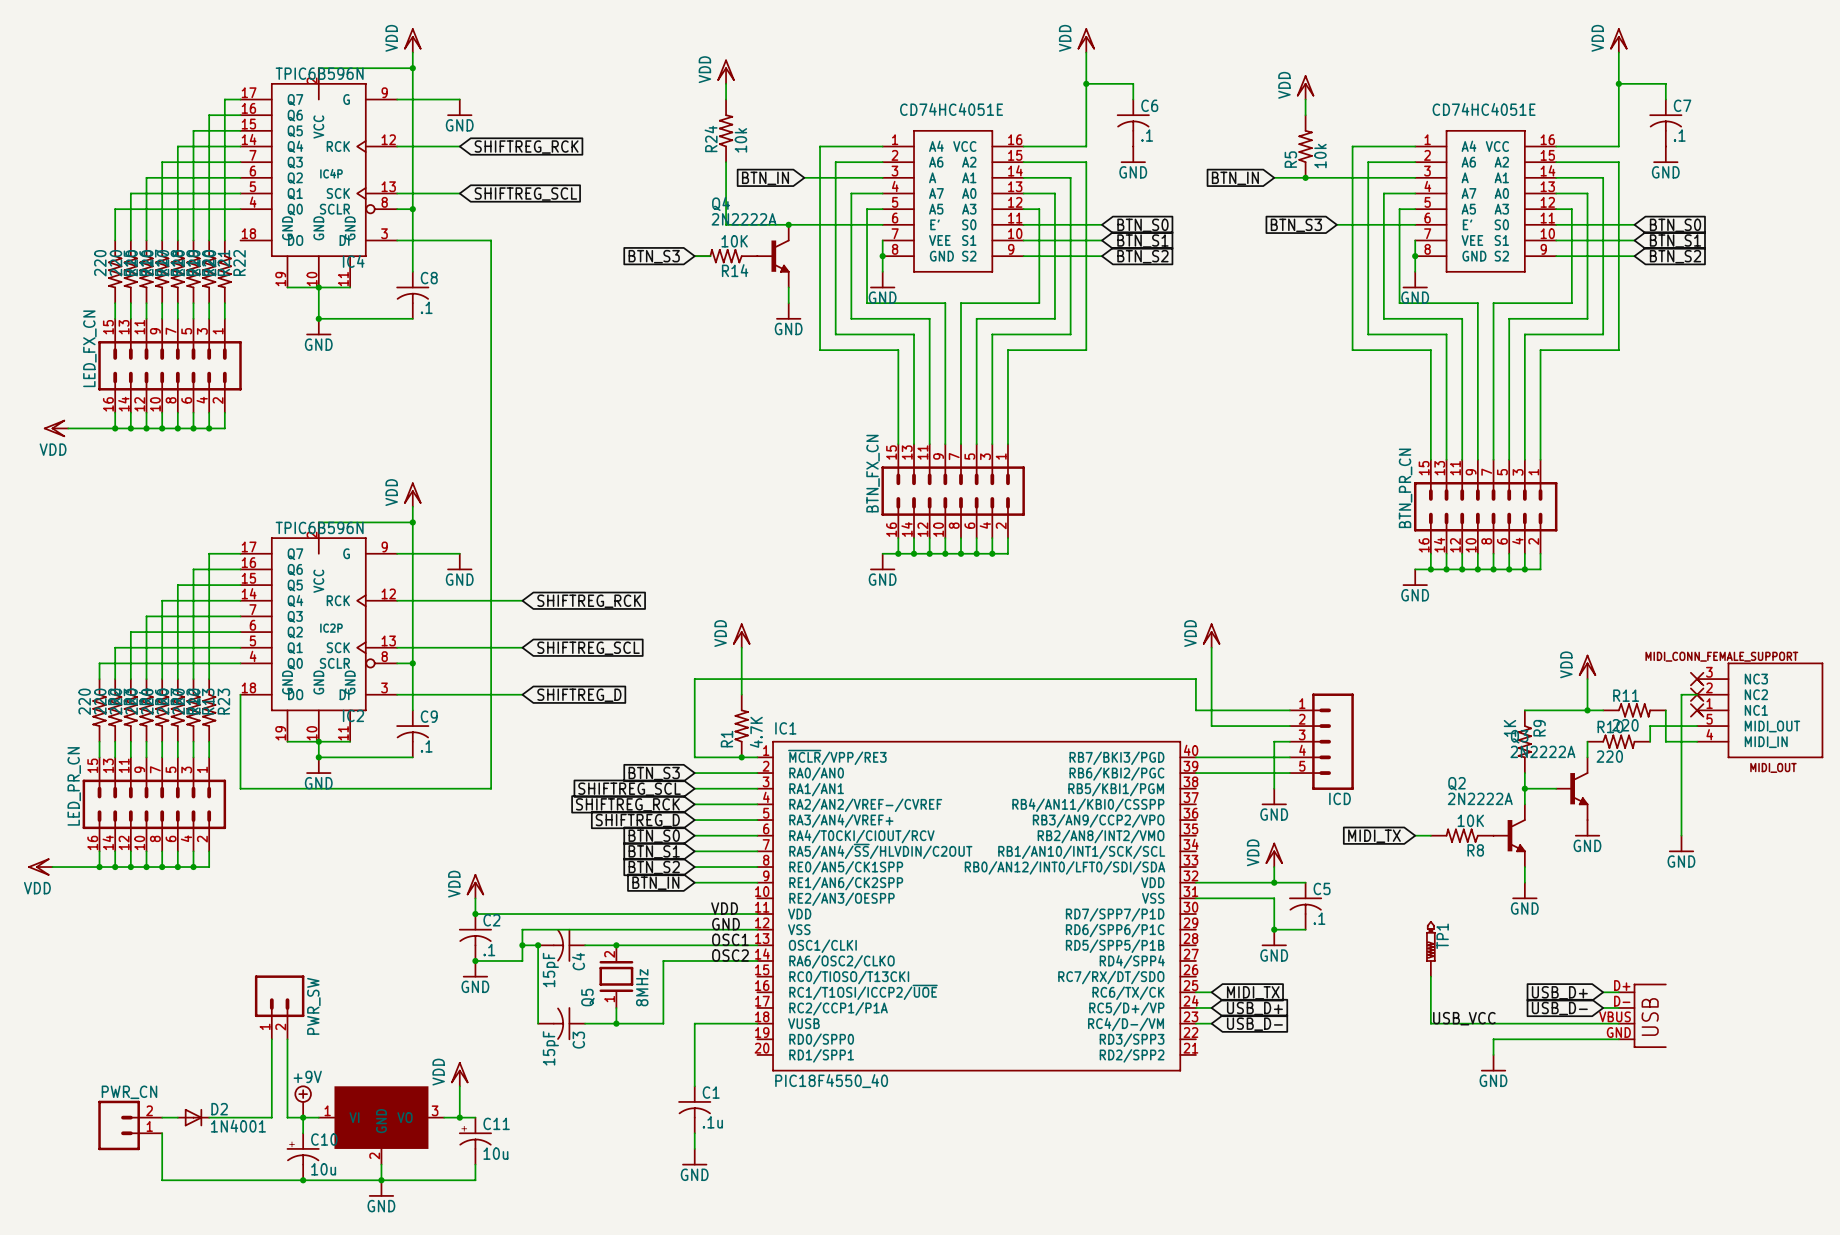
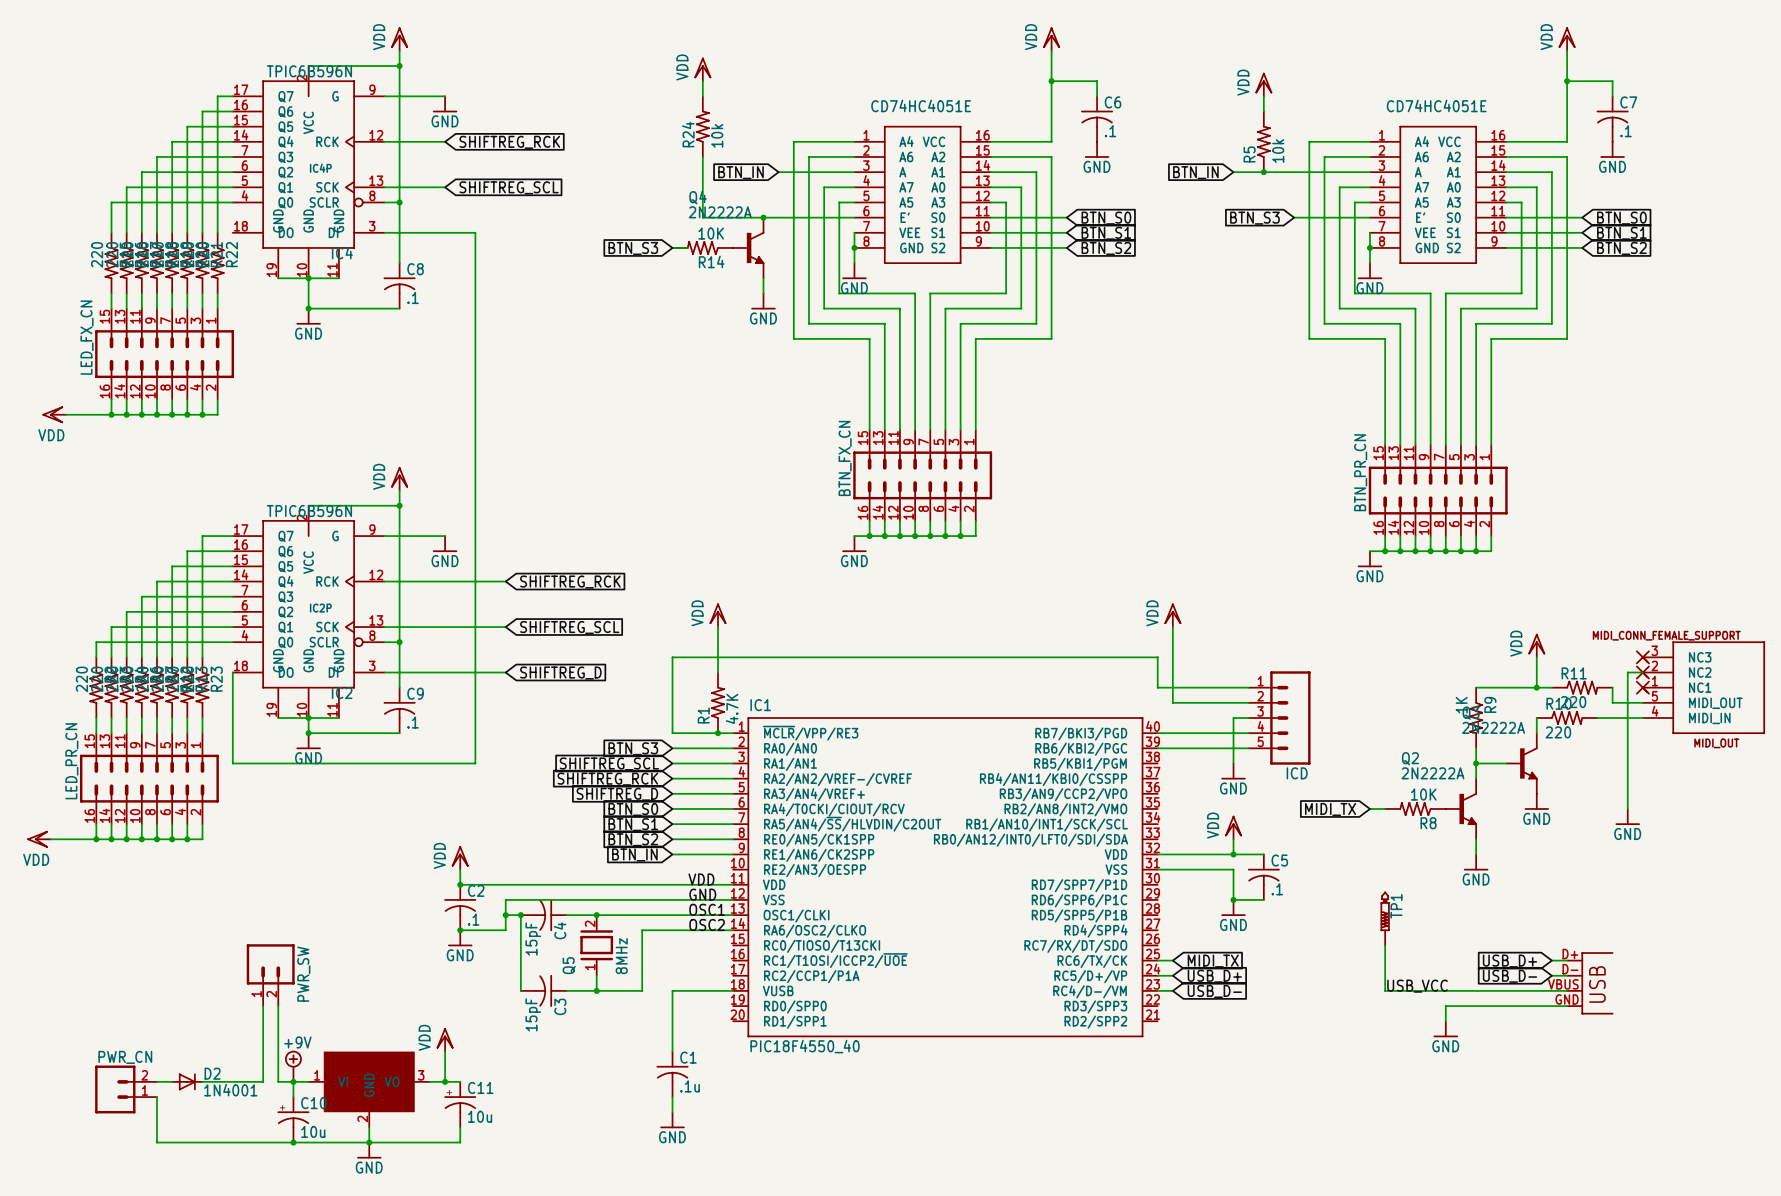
wire: (1650, 741) (1650, 726) (1665, 726) (1665, 741) -> (1597, 718) (1612, 718)

